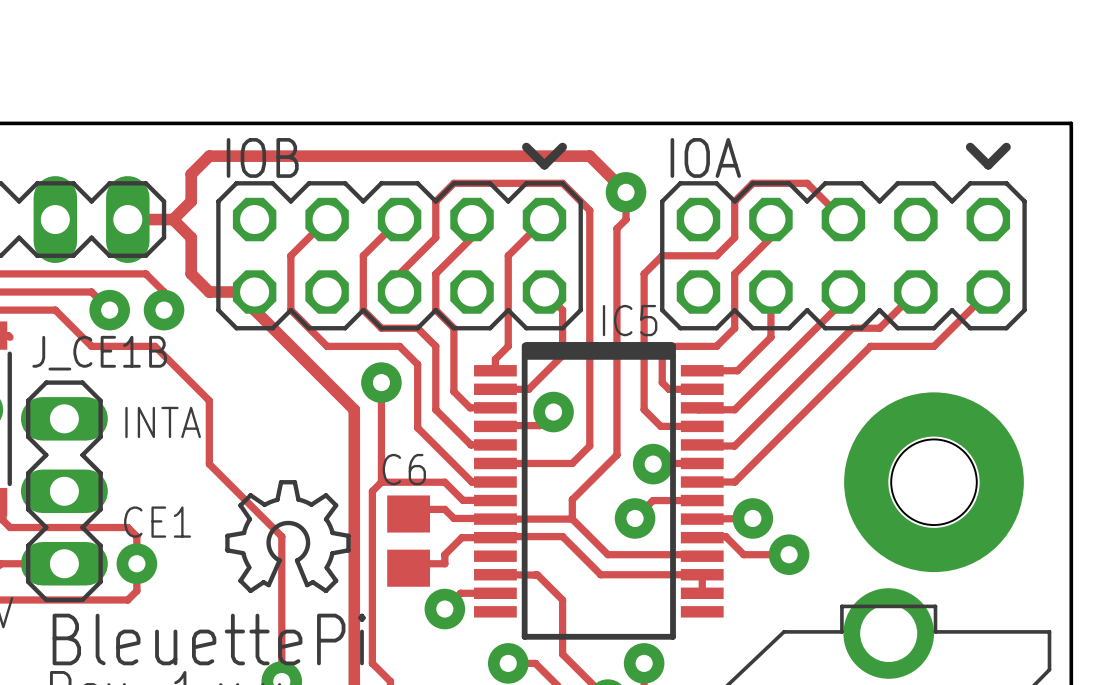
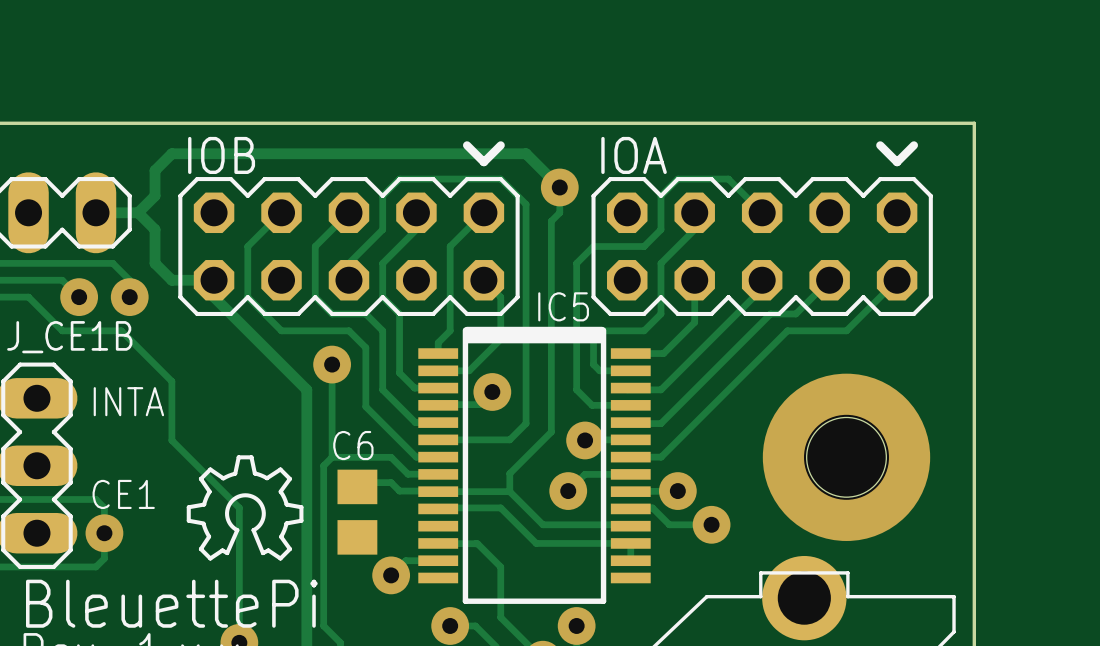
track: (495, 537) (461, 537) (444, 554) (444, 563) (413, 563) (408, 568) -> none

